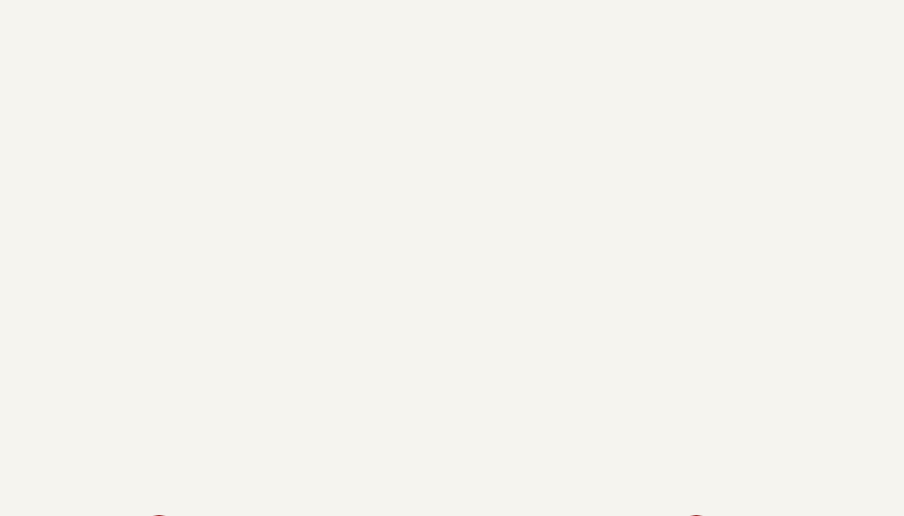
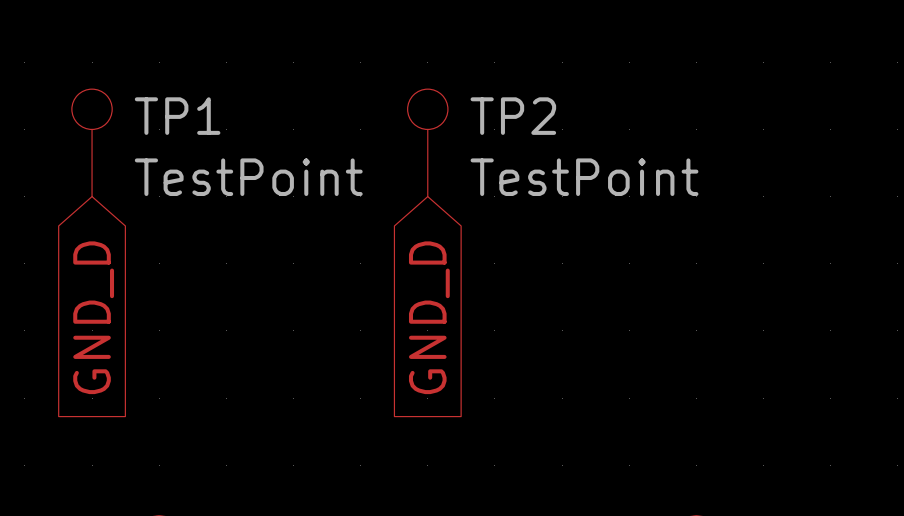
TP1: none -> TestPoint (92, 142)
TP2: none -> TestPoint (427, 142)
global label: none -> GND_D (93, 317)
global label: none -> GND_D (429, 317)

